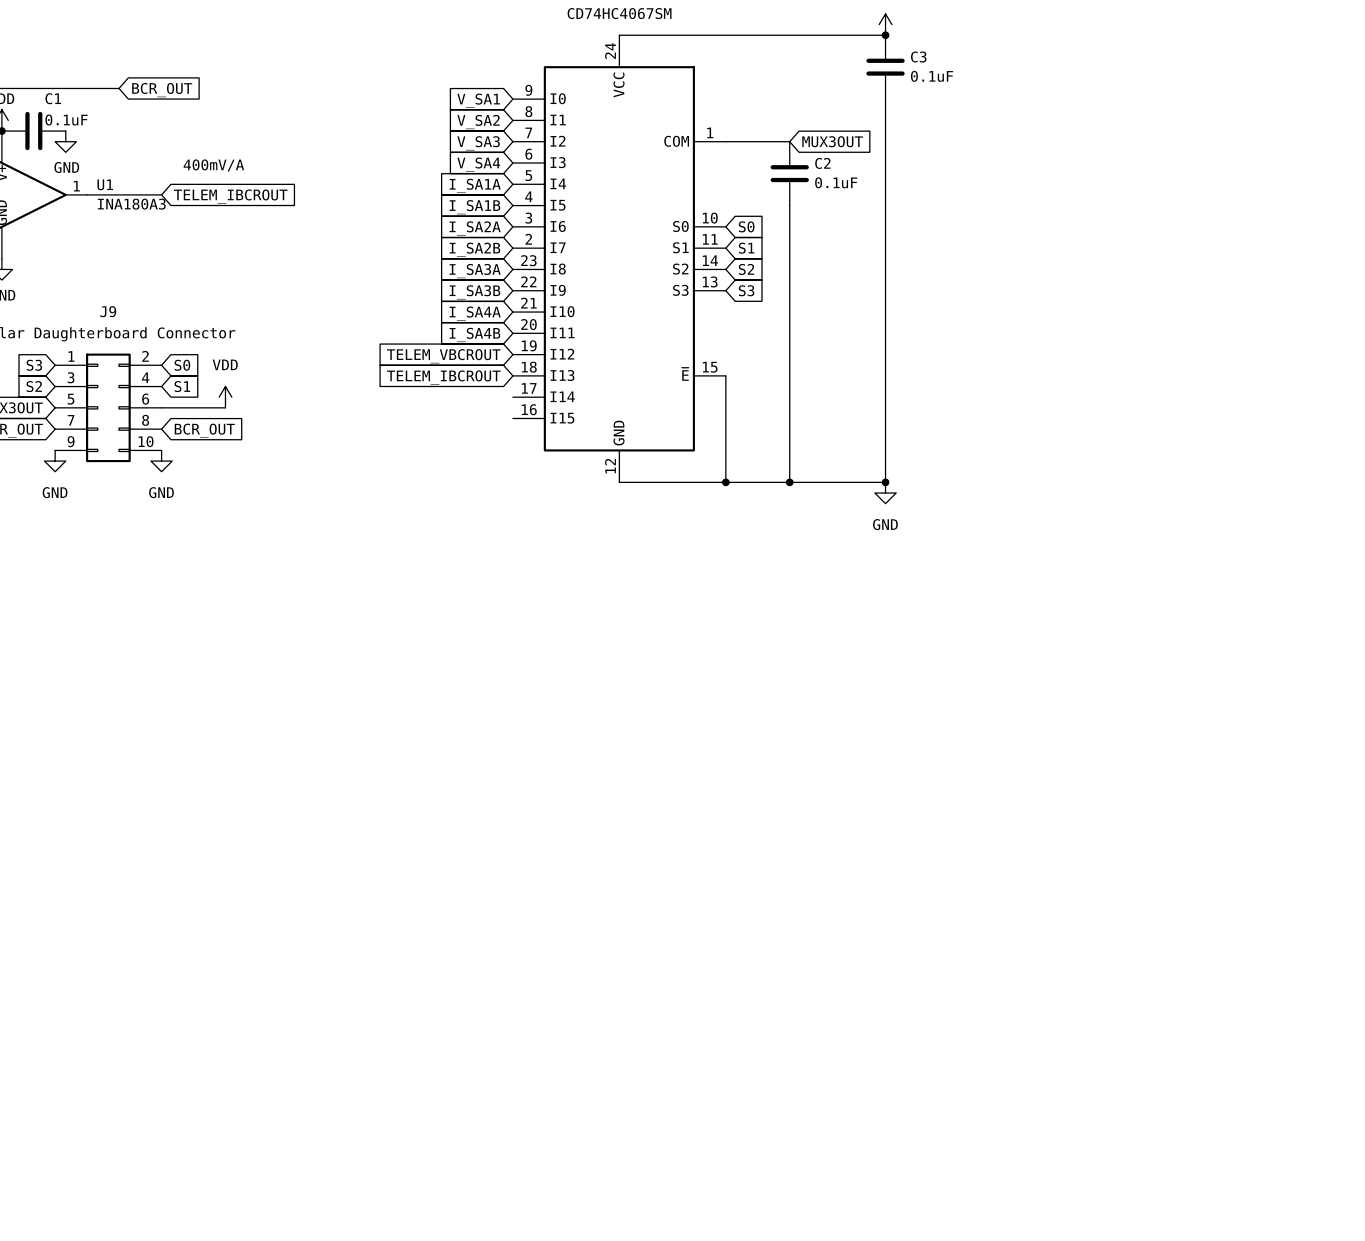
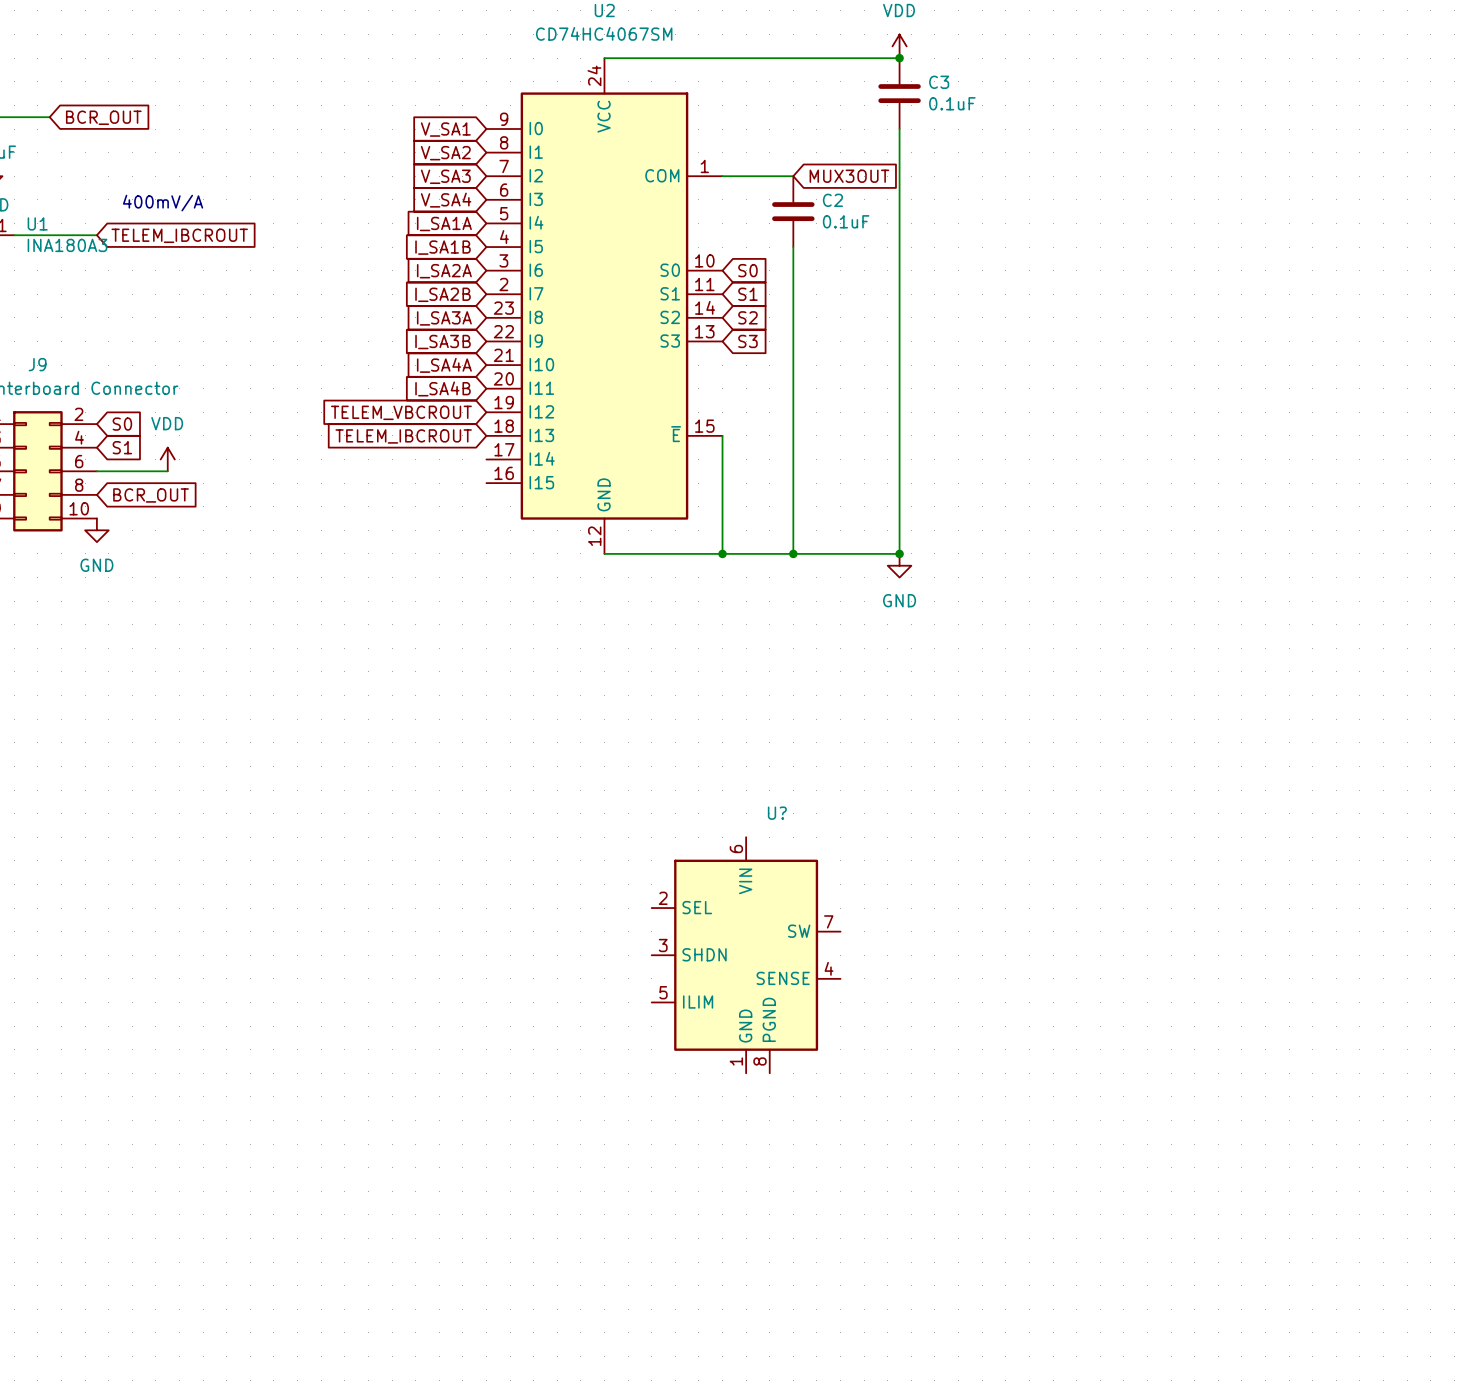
U?: none -> (746, 955)

